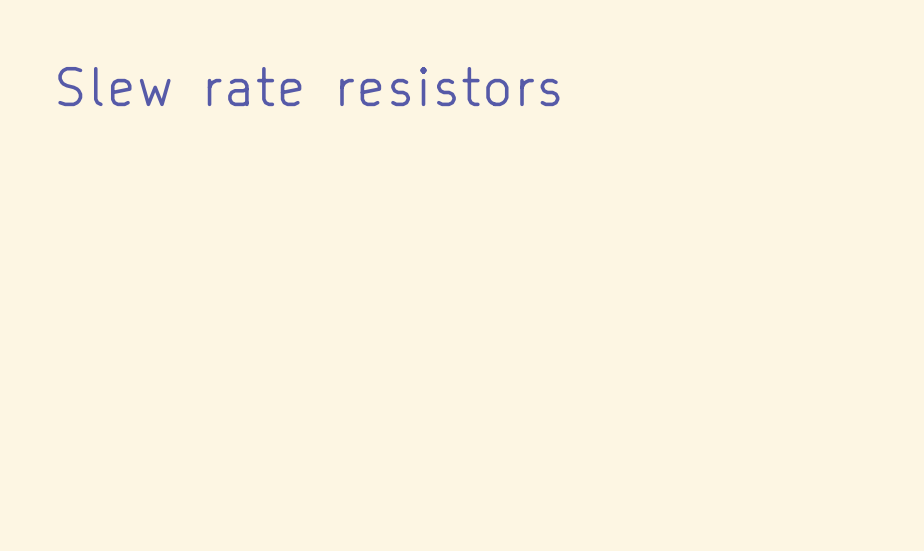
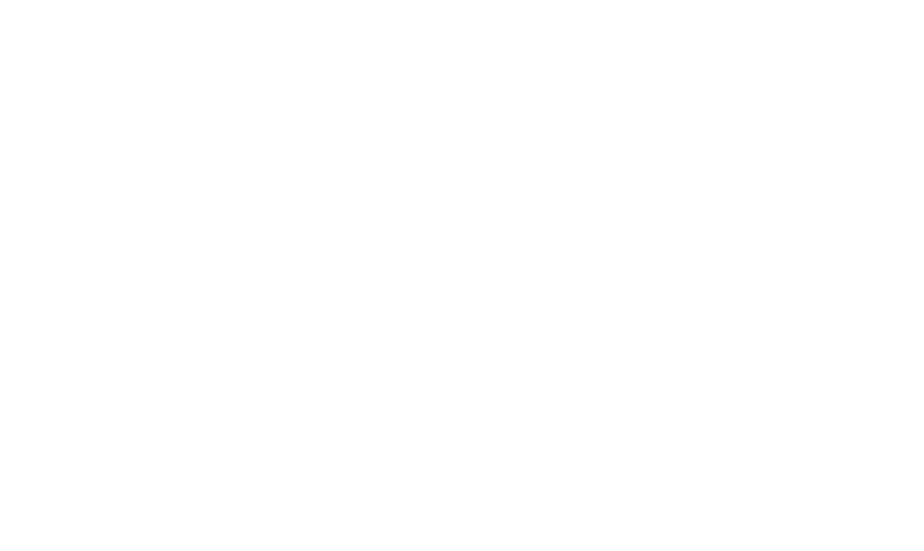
text: Slew rate resistors (308, 86) -> none

